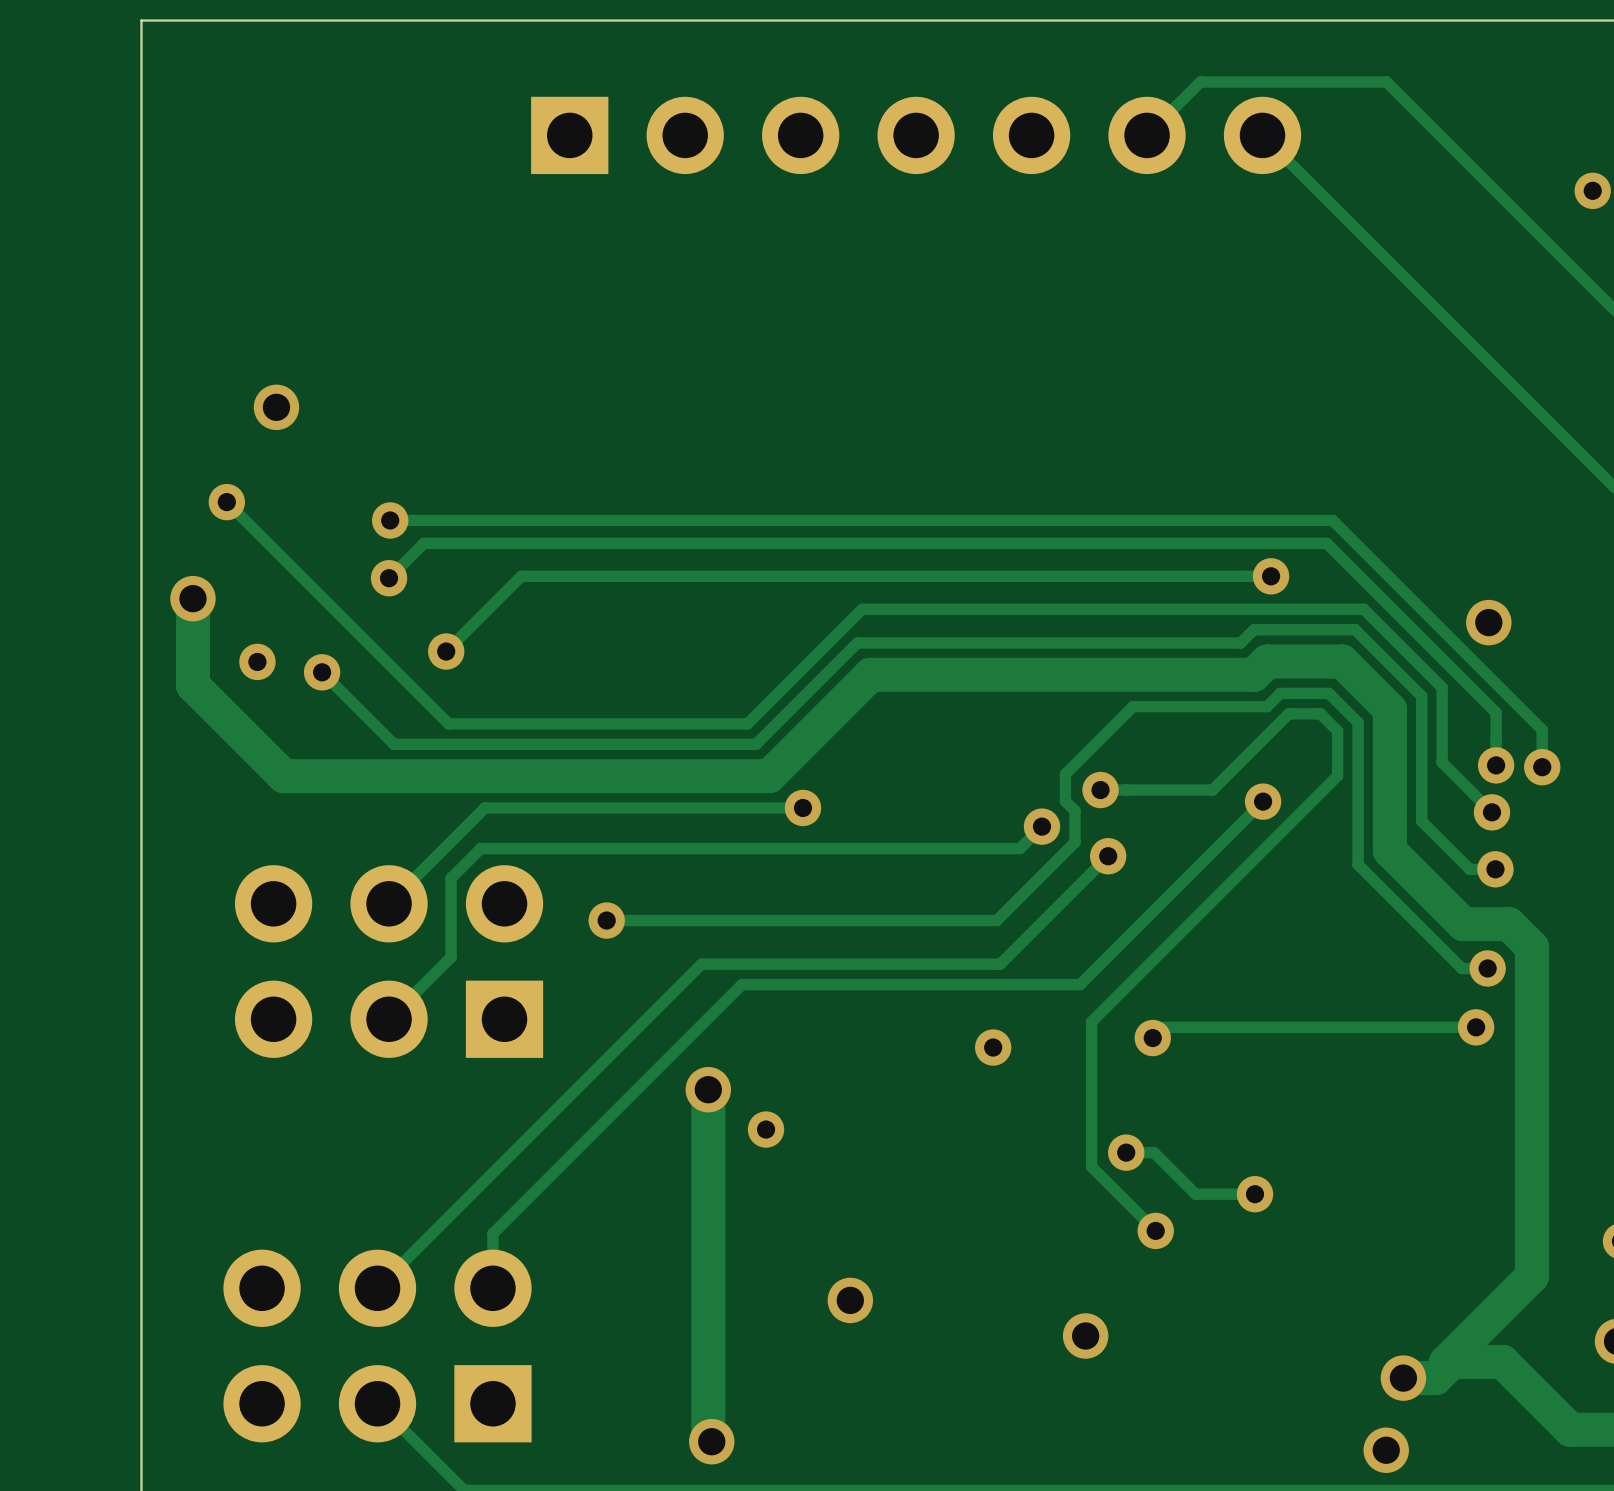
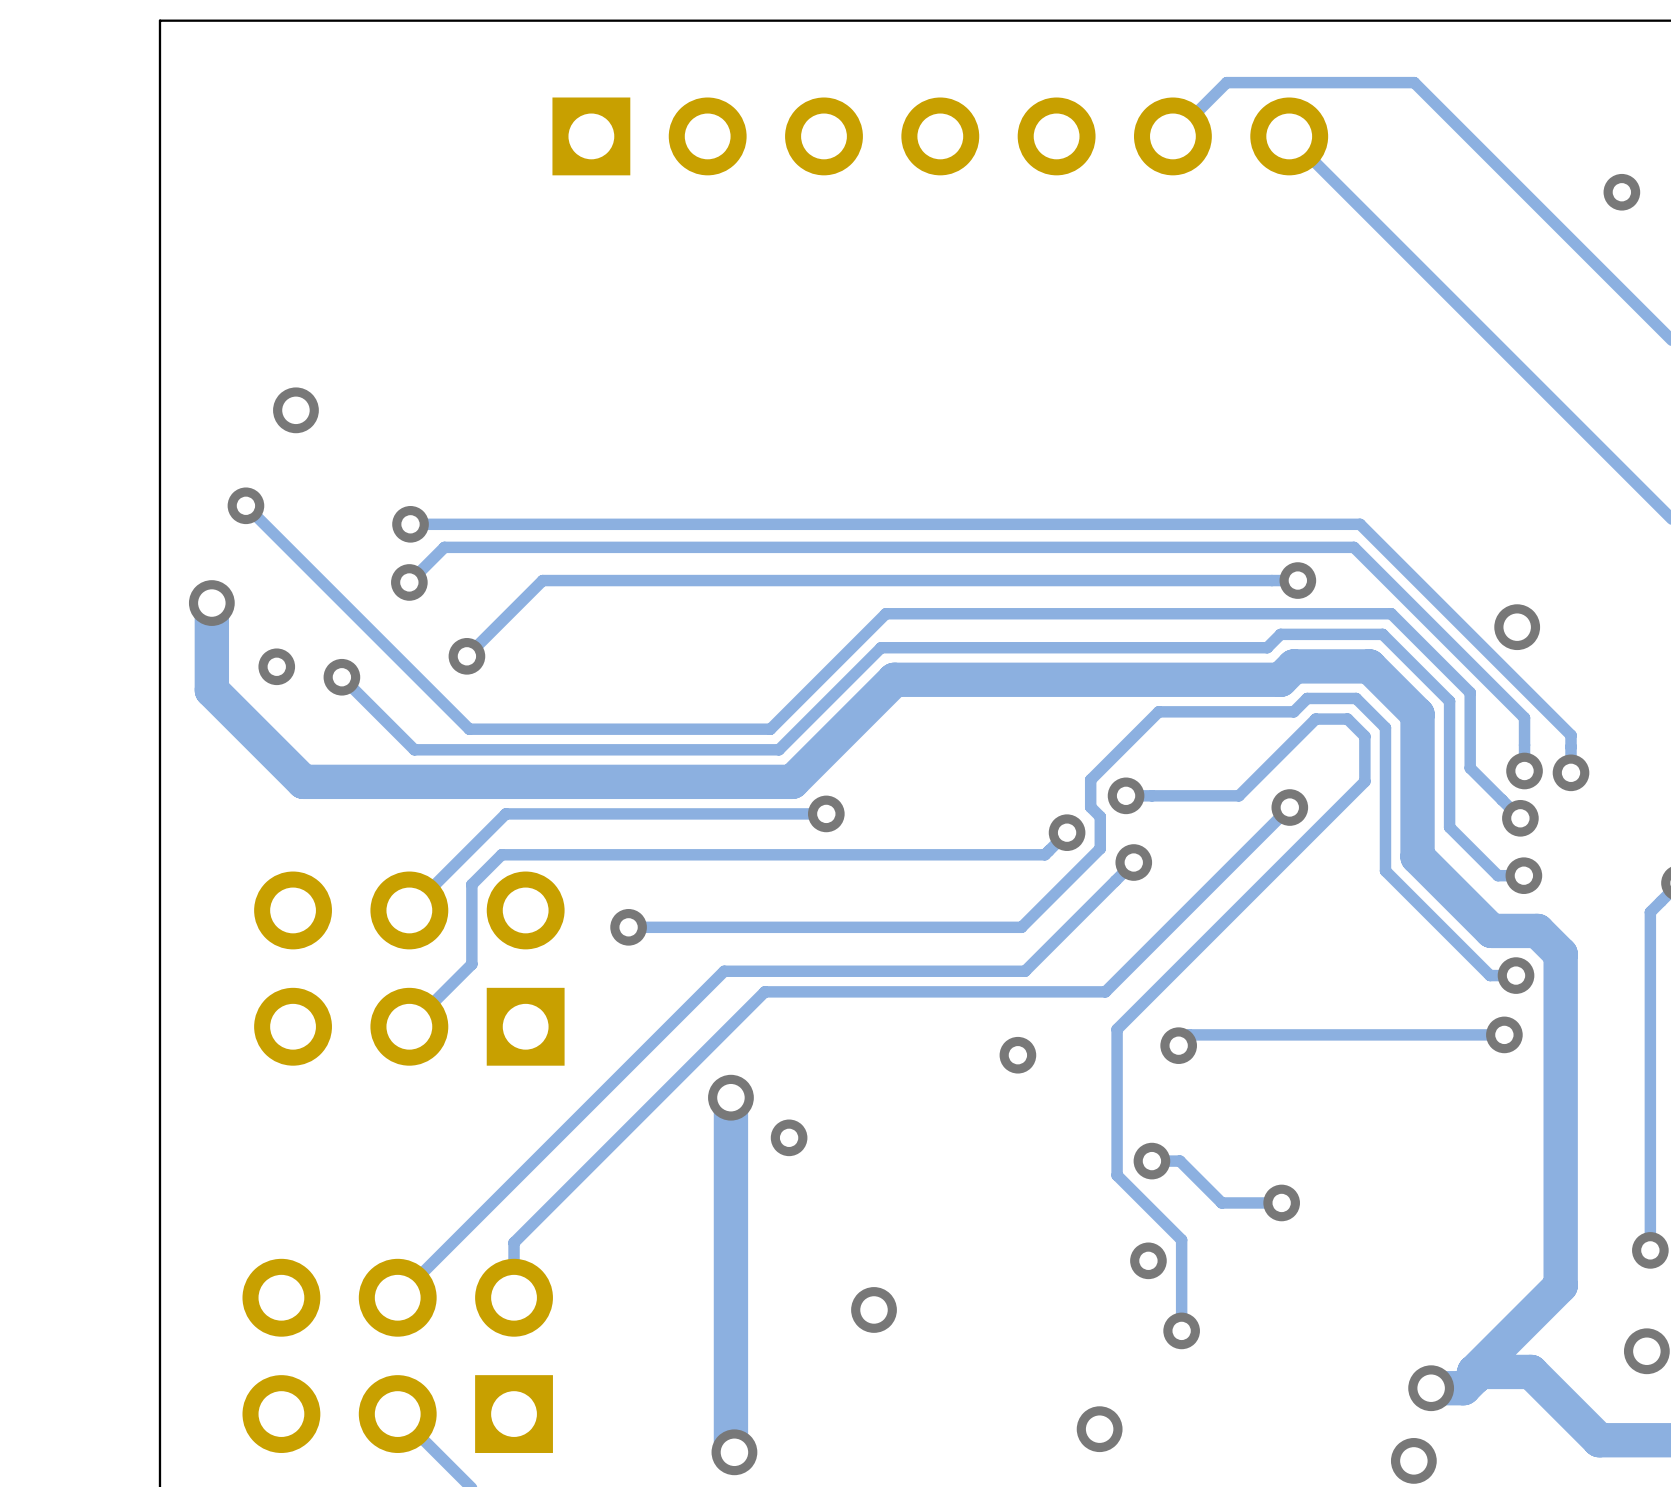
track: none -> (1181, 1239) (1181, 1330)
via position: (1155, 1230) -> (1148, 1260)
via: none -> (1181, 1330)
via position: (1085, 1336) -> (1099, 1429)

